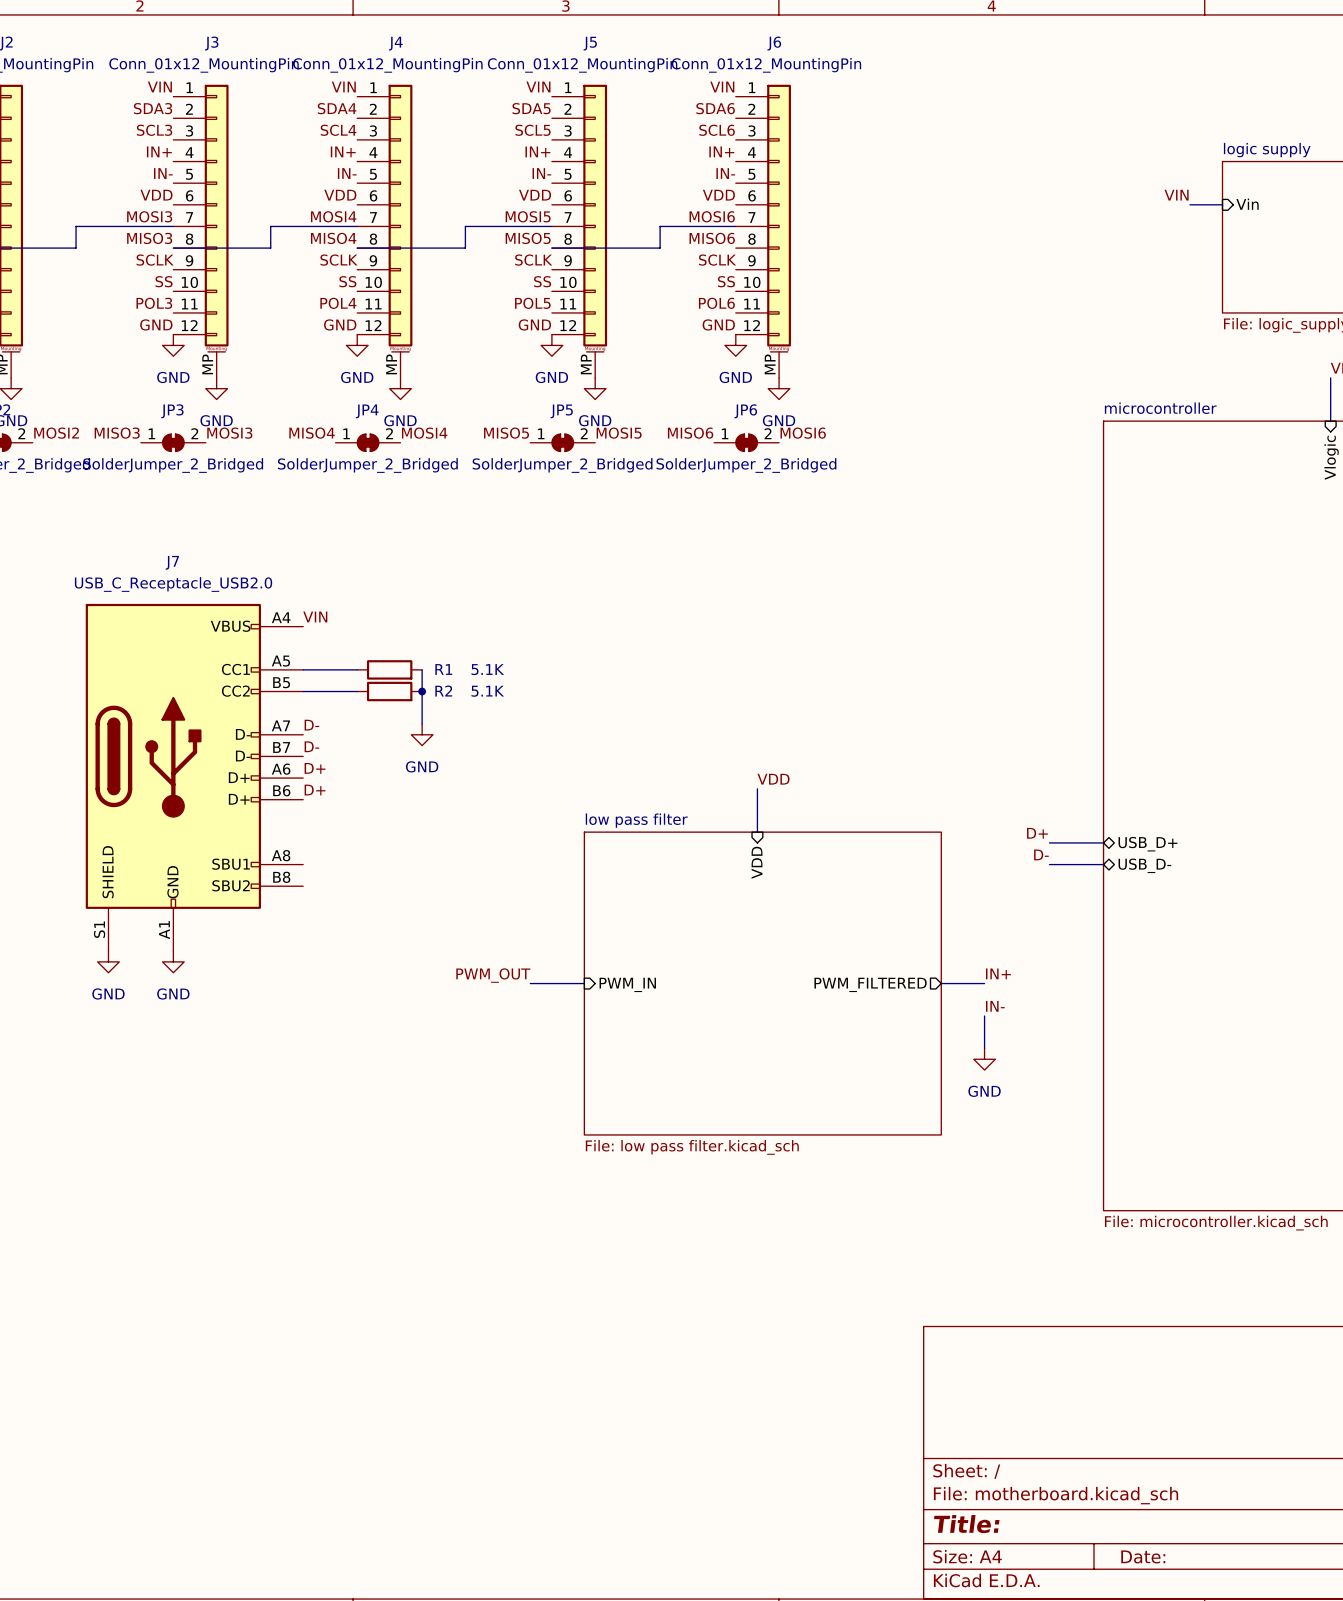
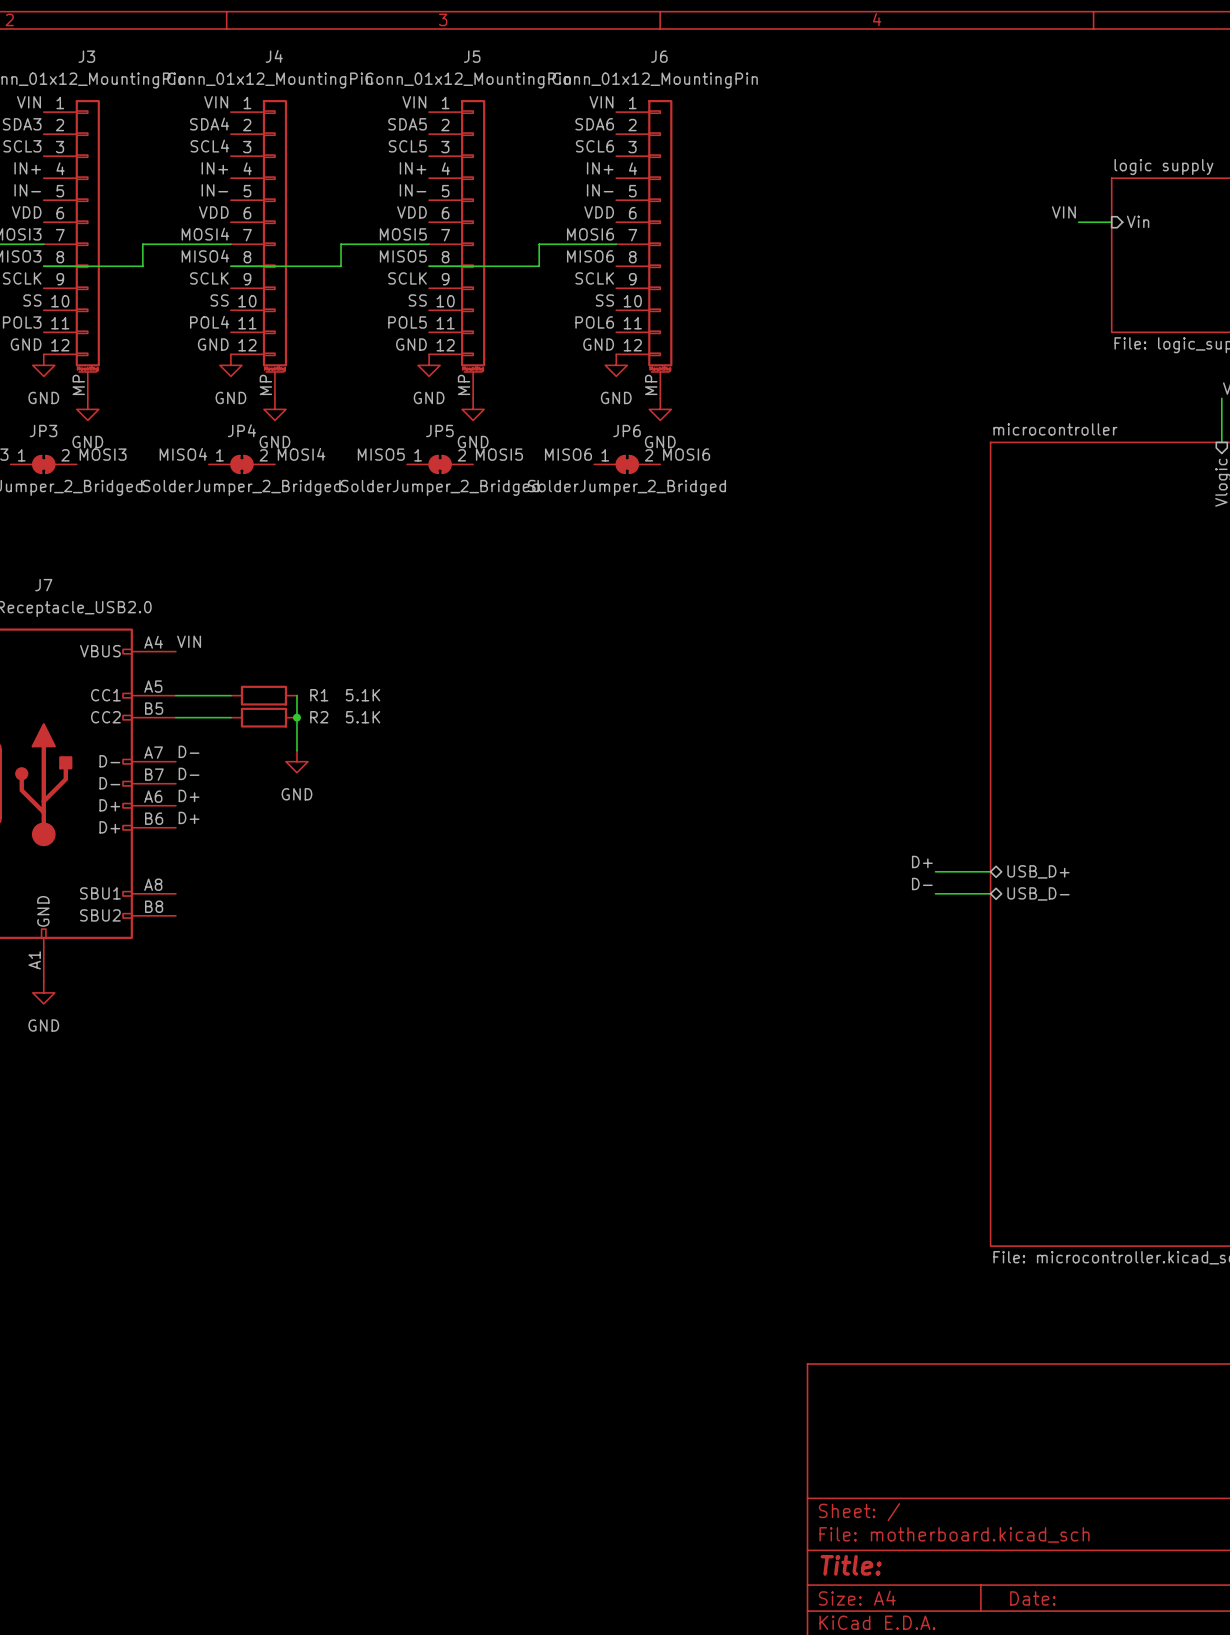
label: VDD (773, 779) -> none
wire: (757, 788) (757, 832) -> none
sheet pin: VDD (757, 862) -> none
label: IN+ (998, 973) -> none
label: PWM_OUT (493, 975) -> none
wire: (530, 983) (584, 983) -> none
sheet low pass filter: File: low pass filter.kicad_sch (762, 983) -> none
wire: (941, 983) (984, 983) -> none
sheet pin: PWM_IN (627, 984) -> none
sheet pin: PWM_FILTERED (870, 984) -> none
label: IN- (995, 1006) -> none
wire: (984, 1016) (984, 1048) -> none
power symbol: GND (984, 1059) -> none

